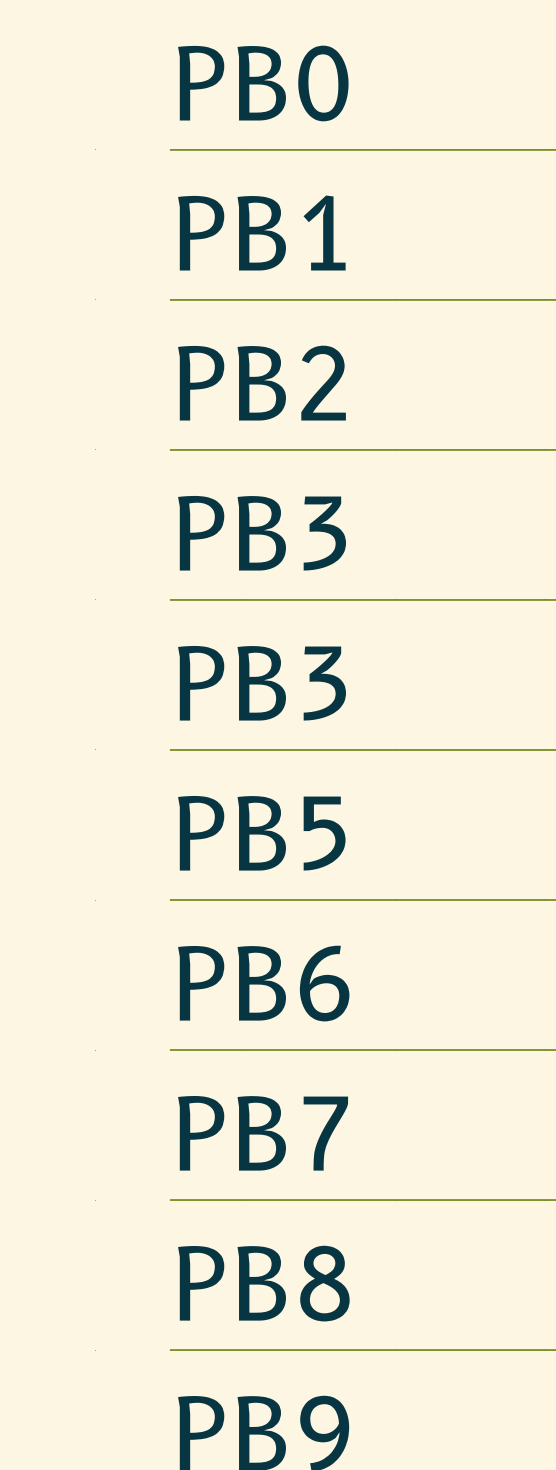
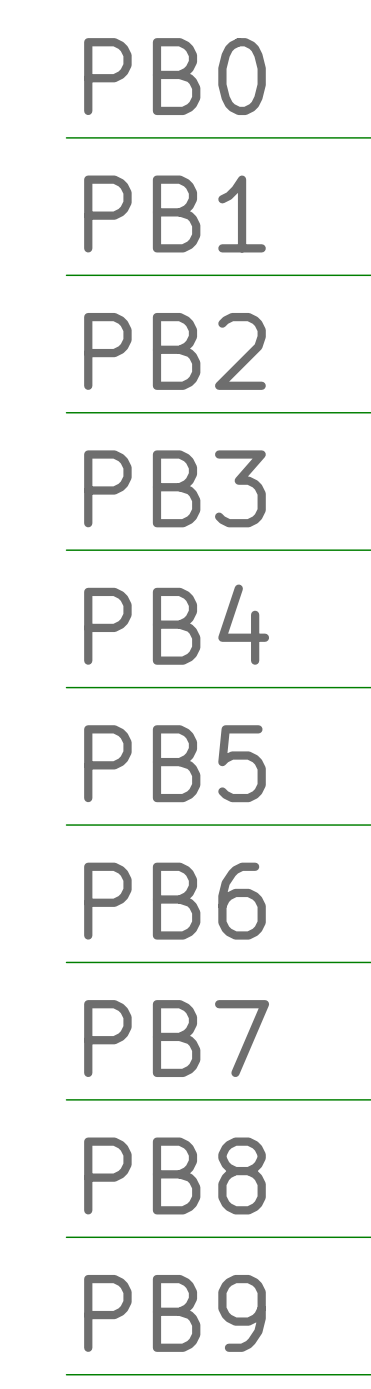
label: PB3 (262, 683) -> PB4 (176, 624)

